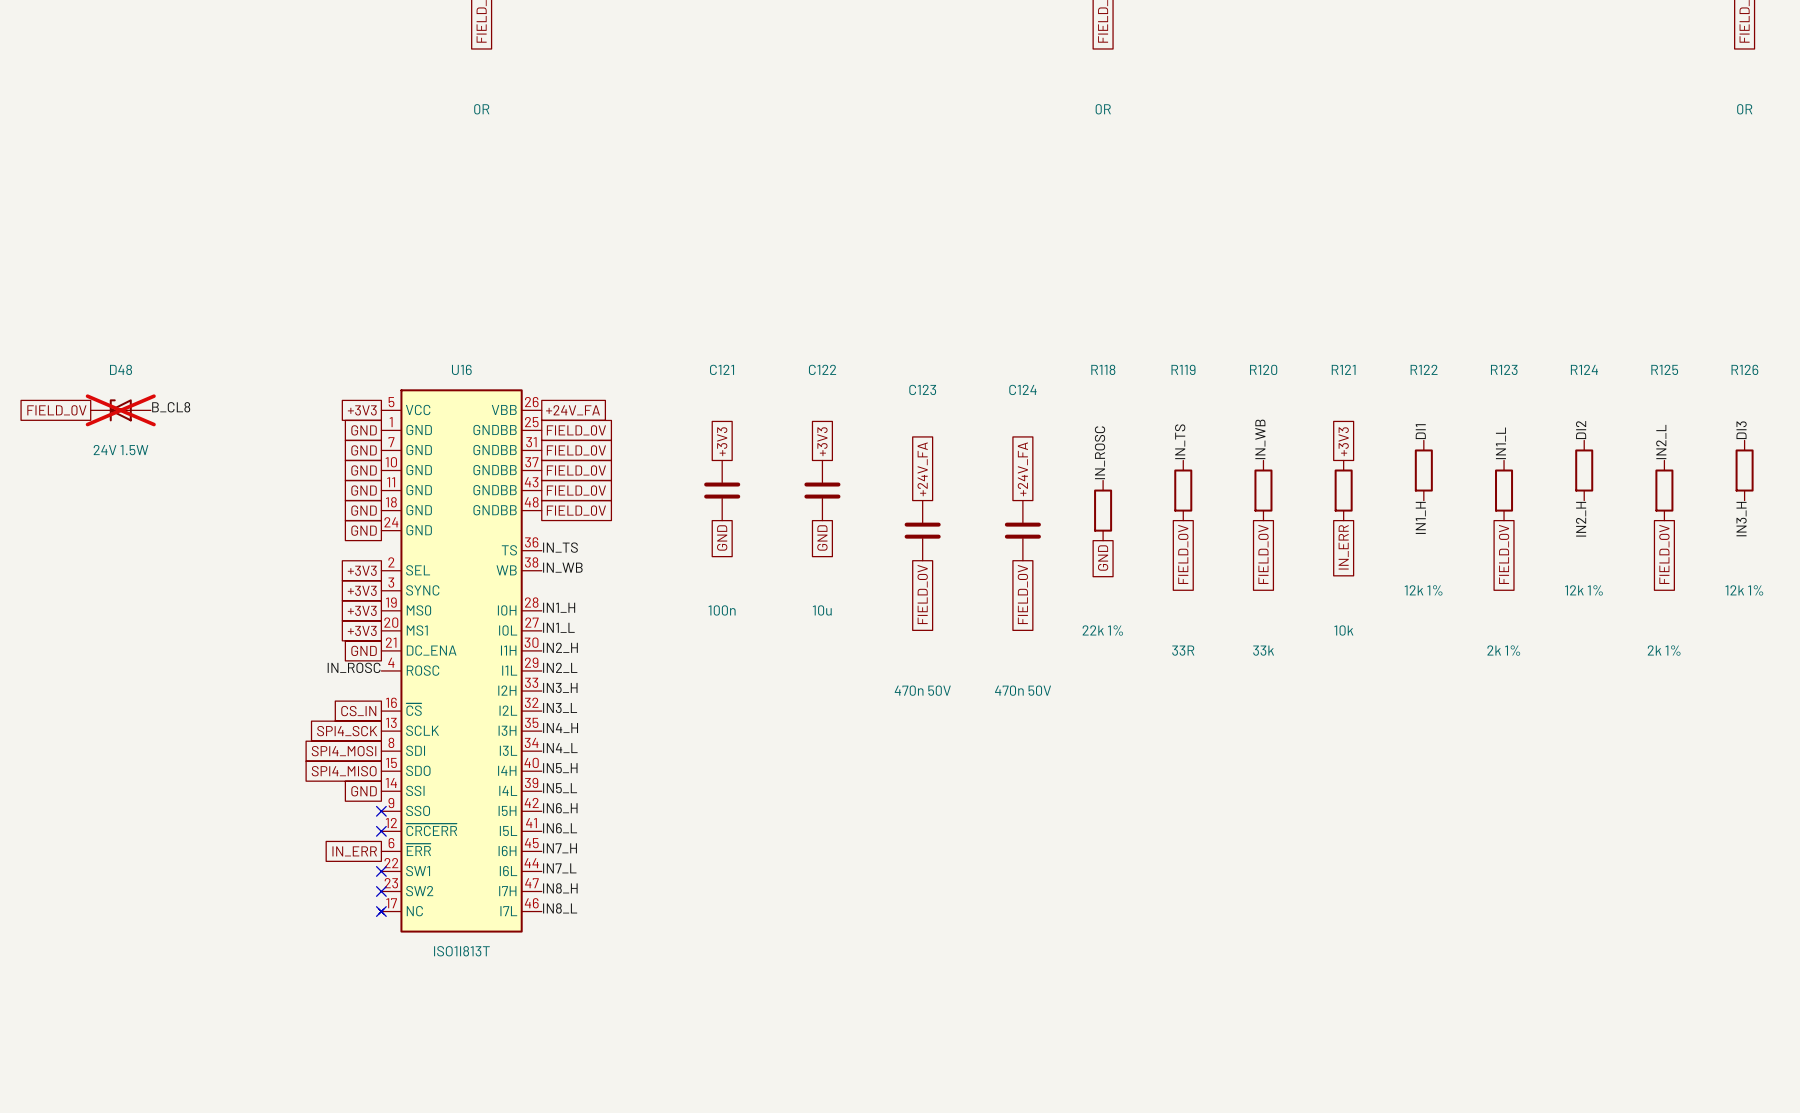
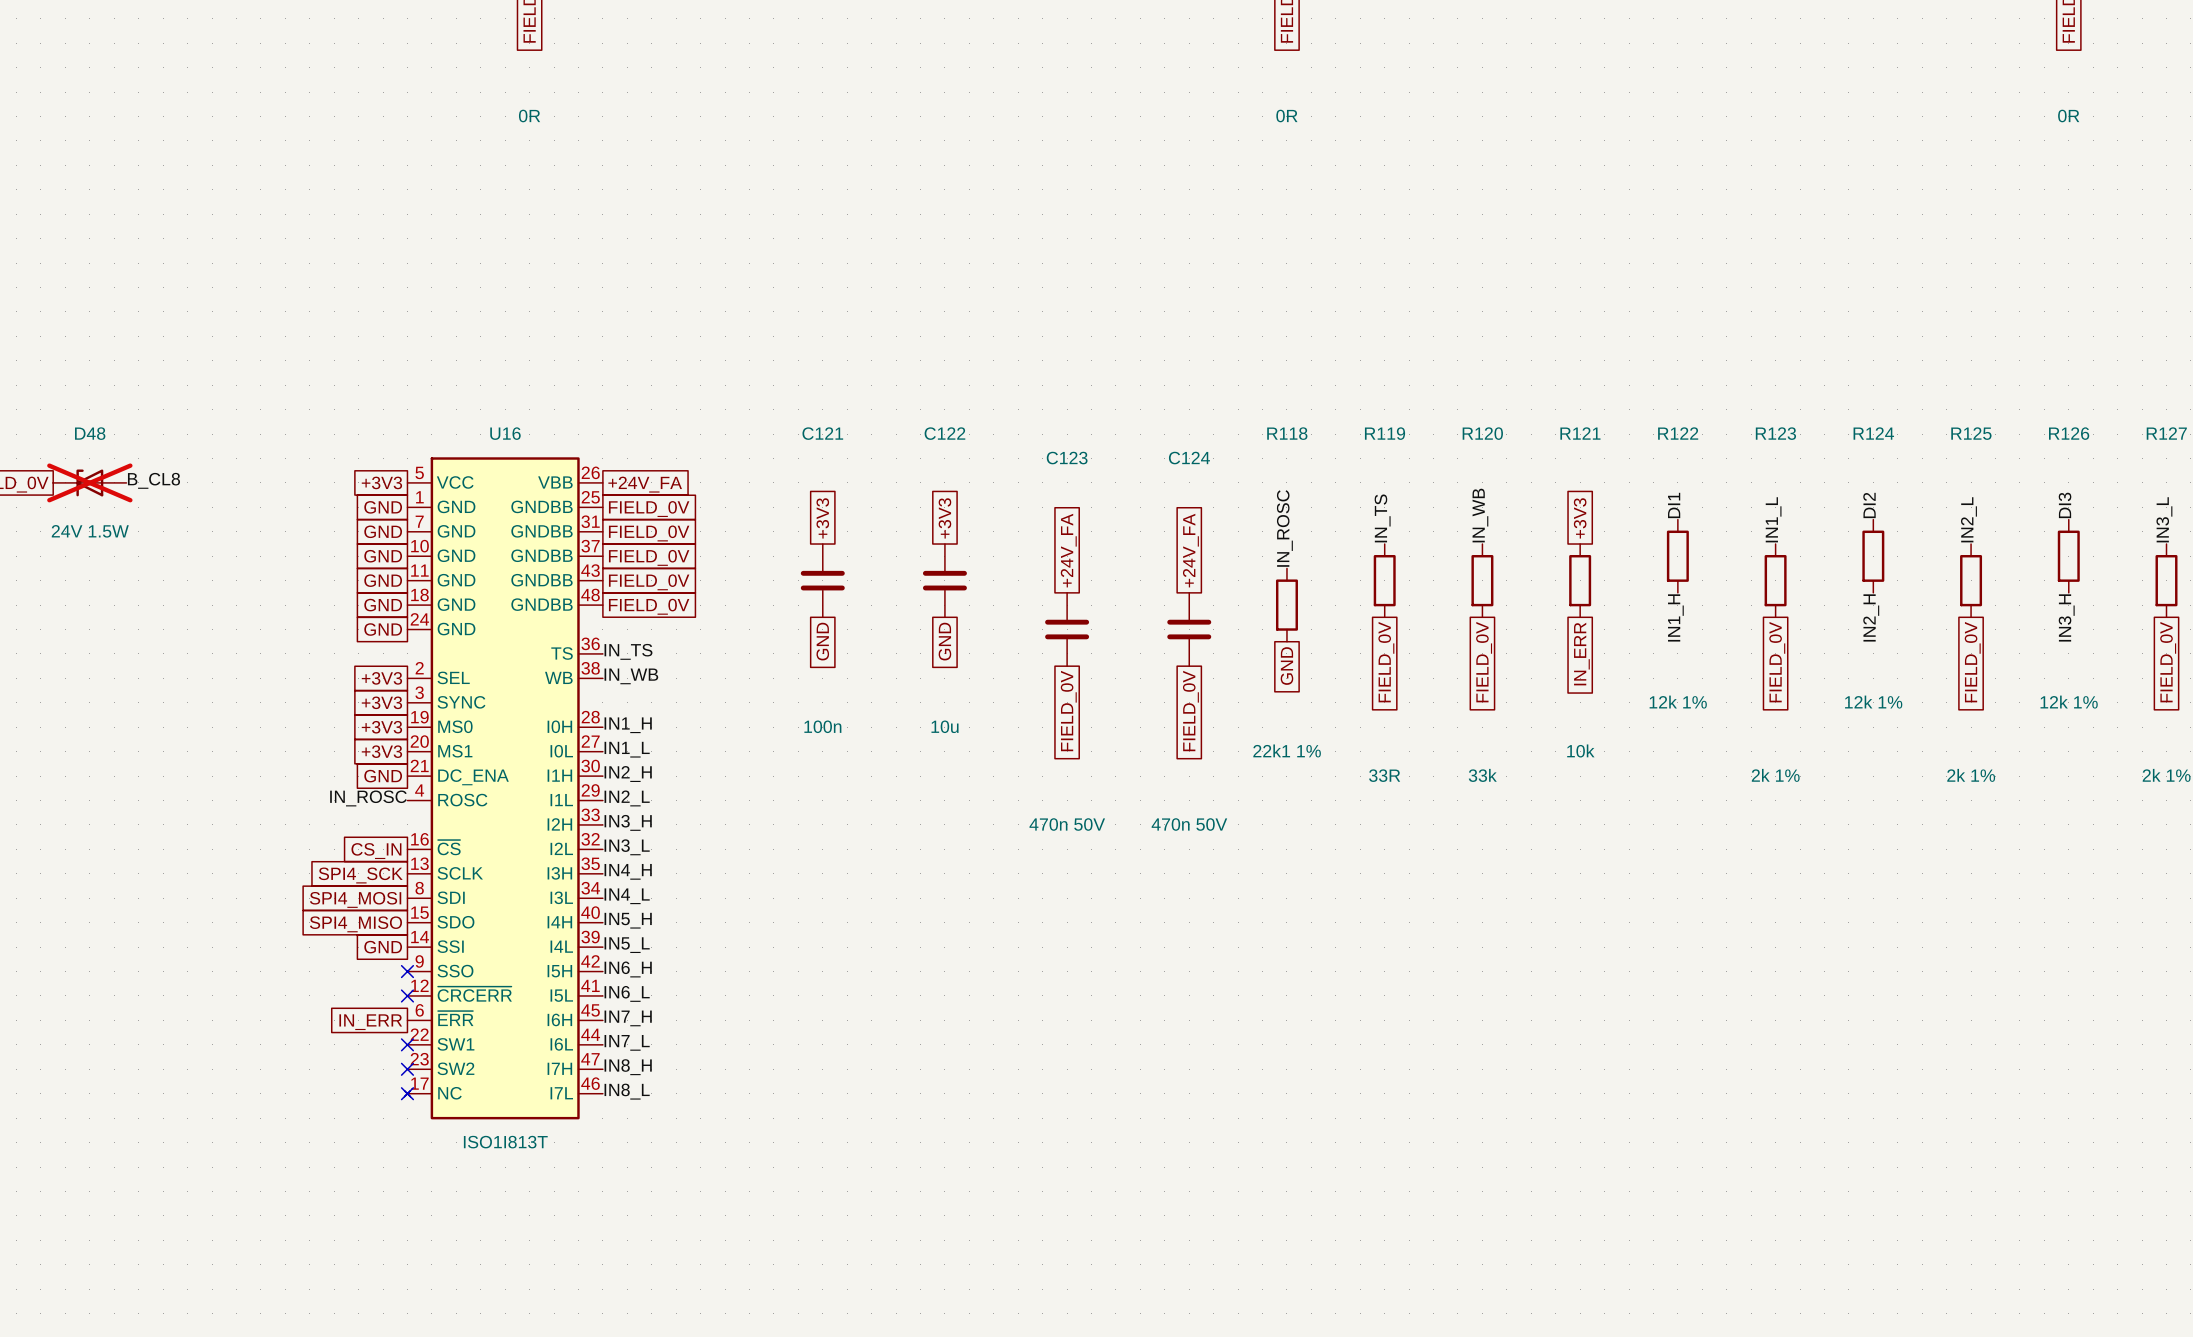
R118 value: 22k 1% (1102, 630) -> 22k1 1% (1287, 750)

